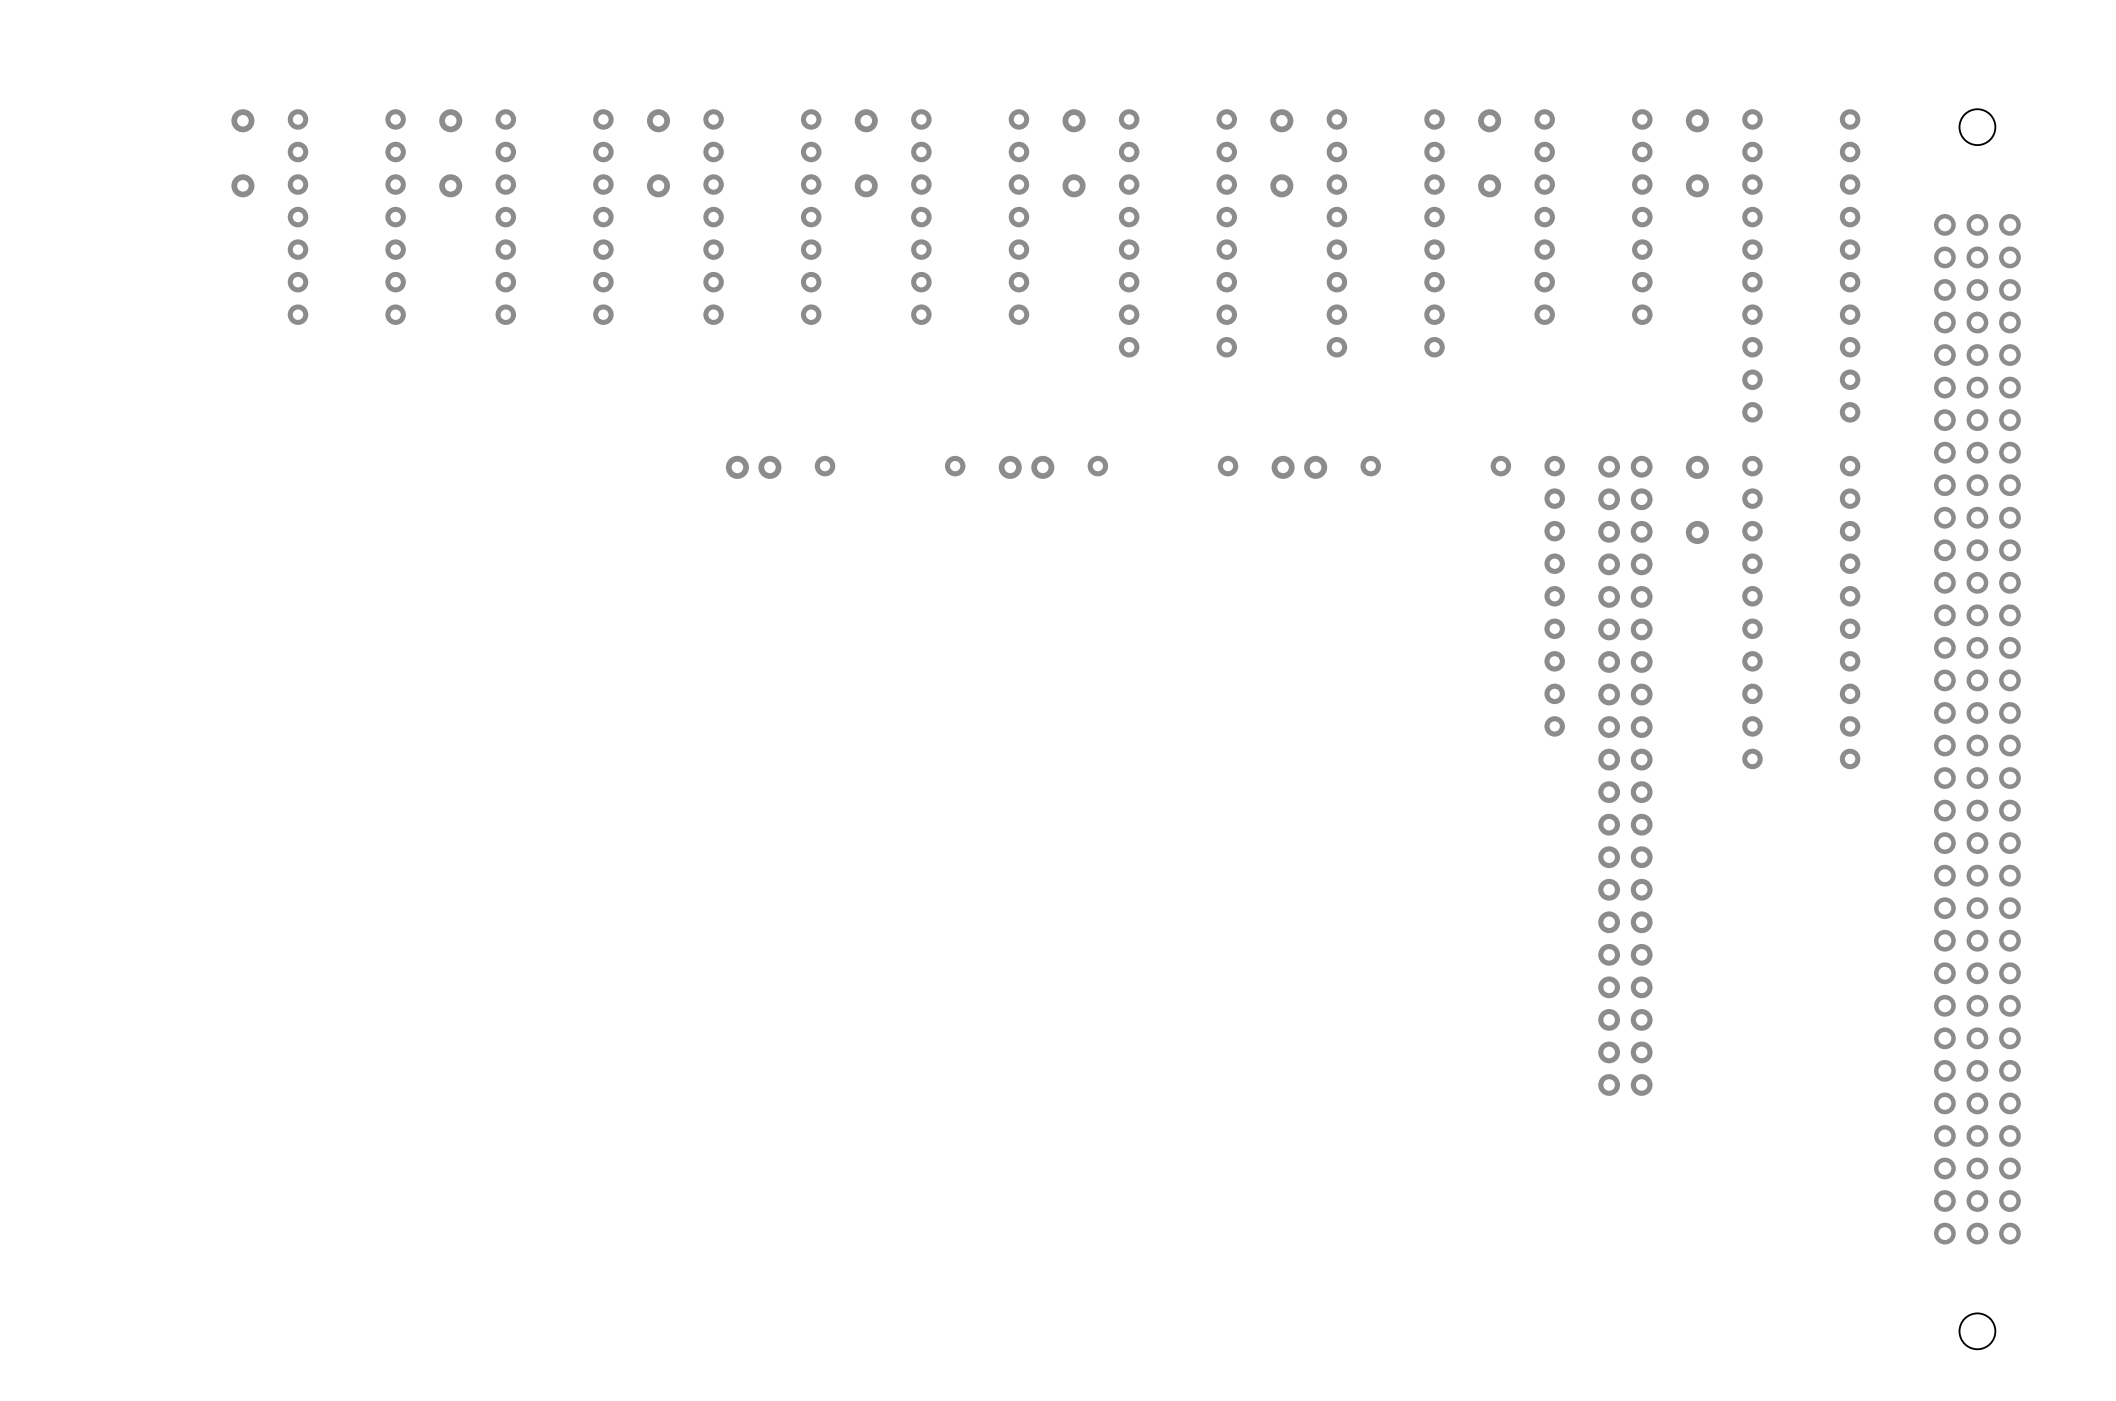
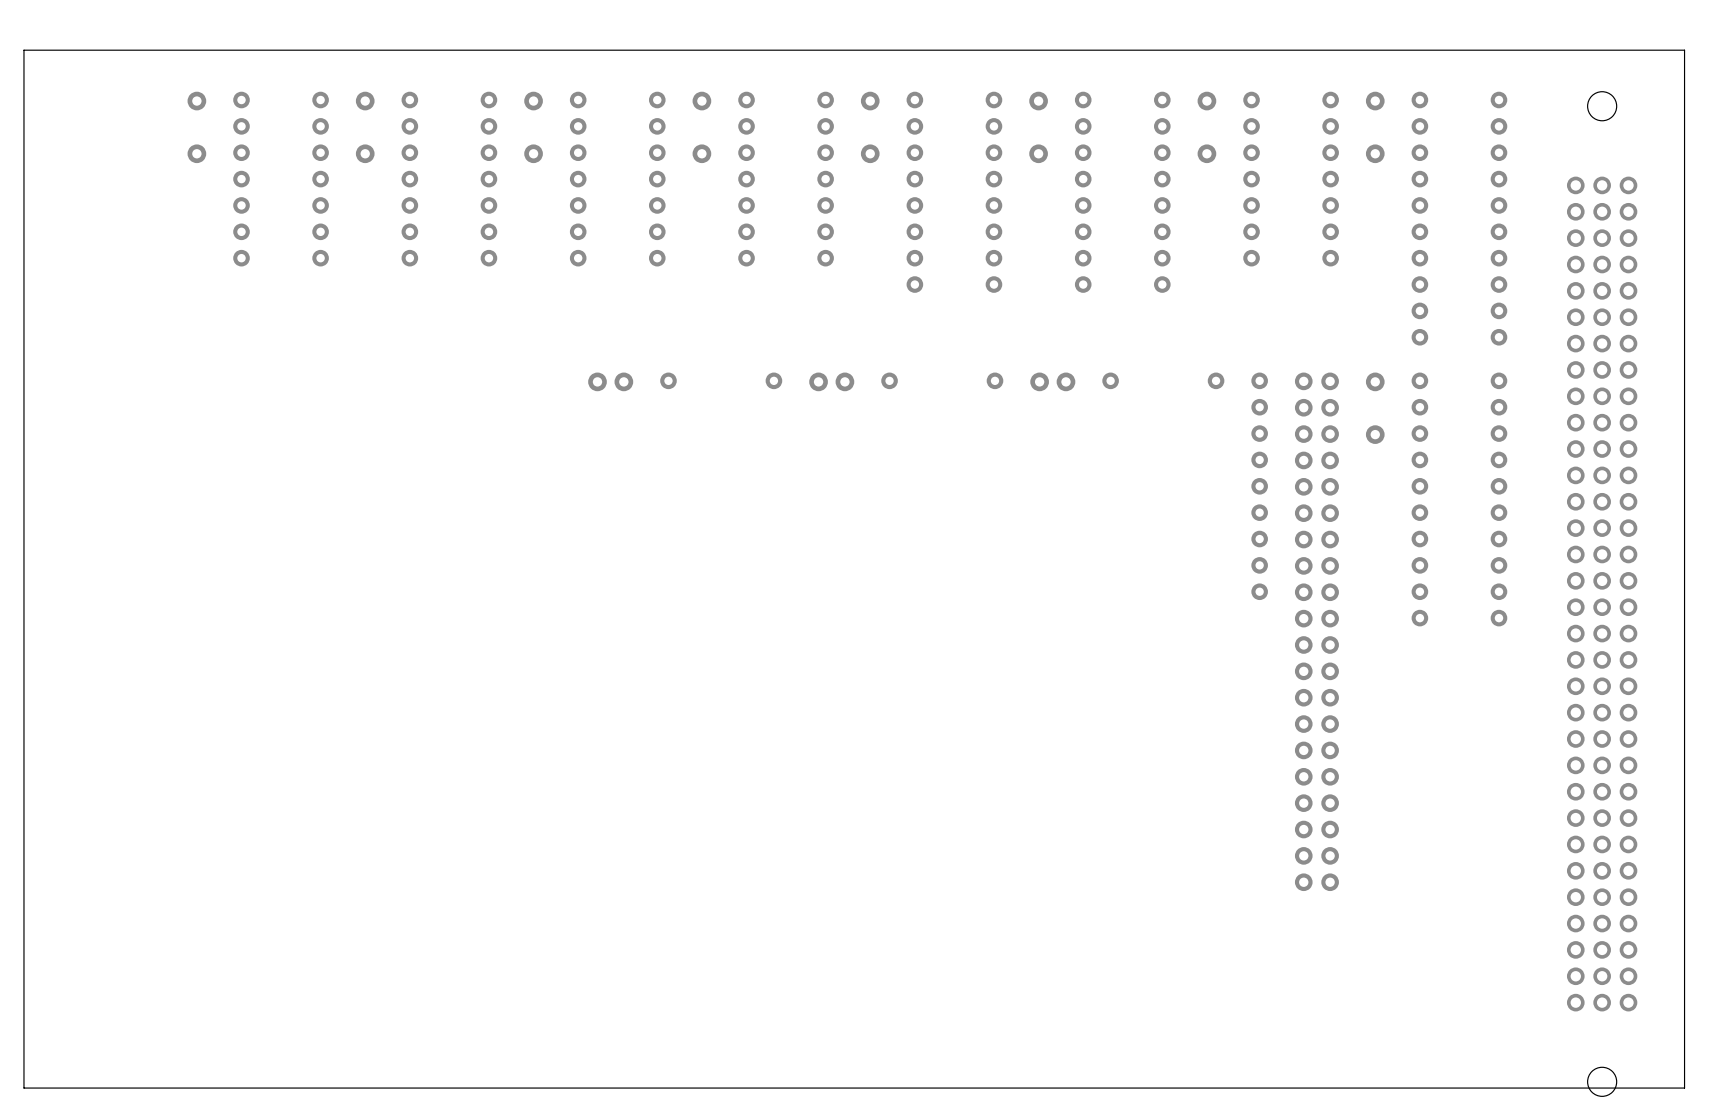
board edge: none -> (1684, 50) (23, 50) (23, 1088) (1684, 1088) (1684, 50)

